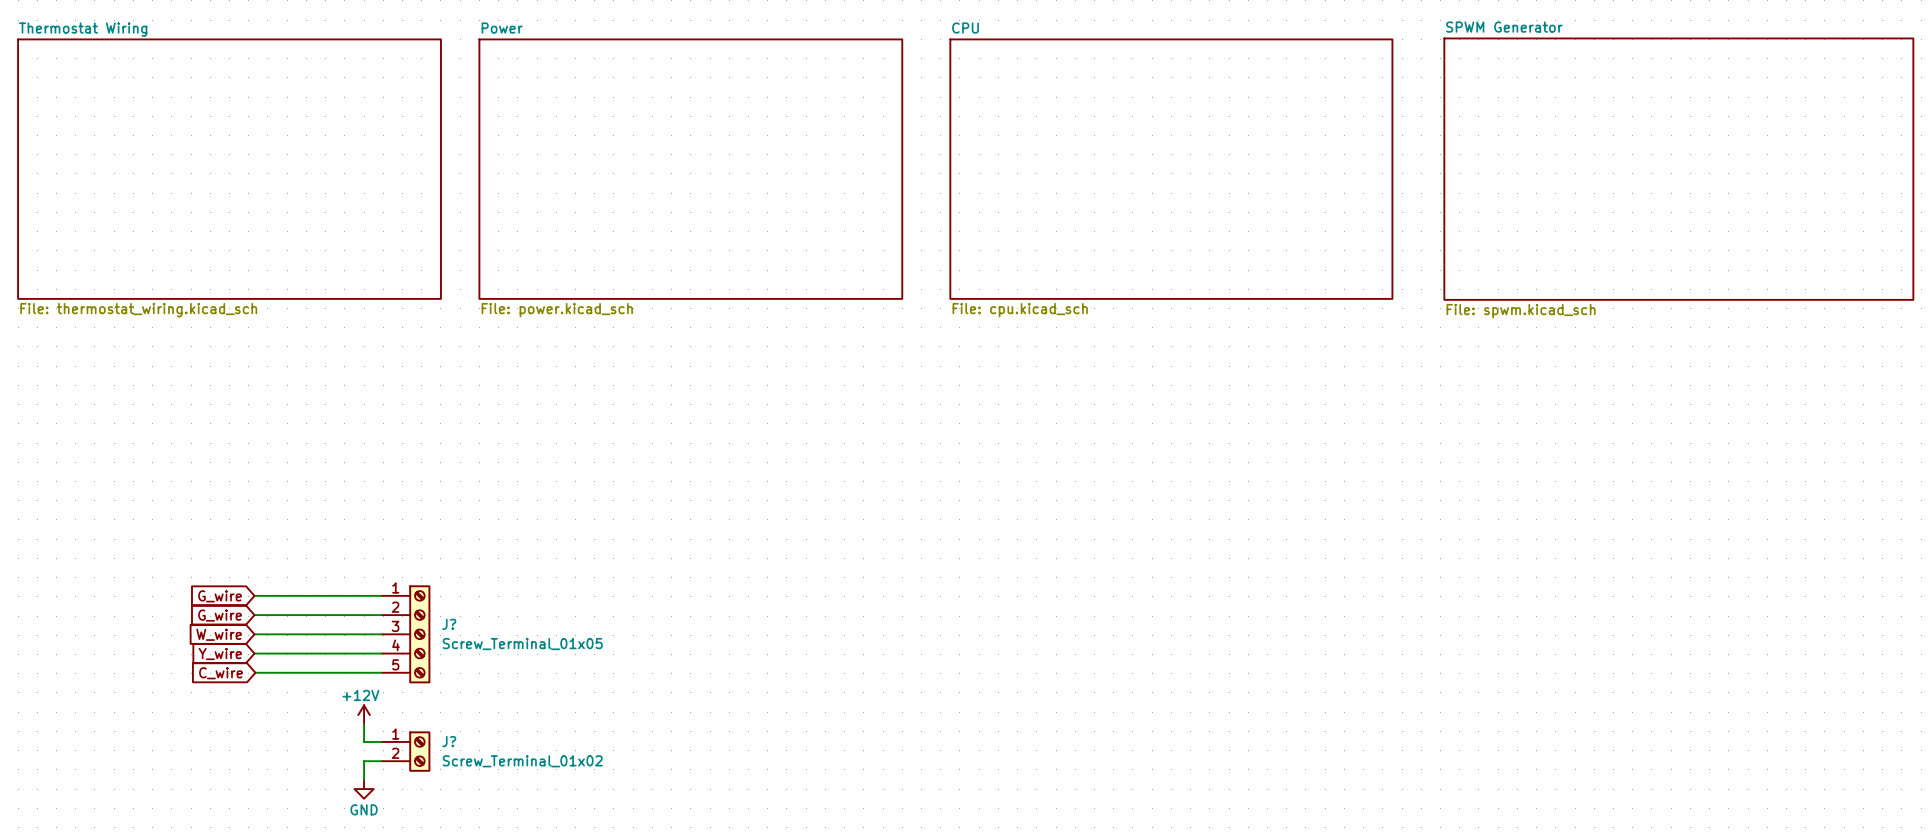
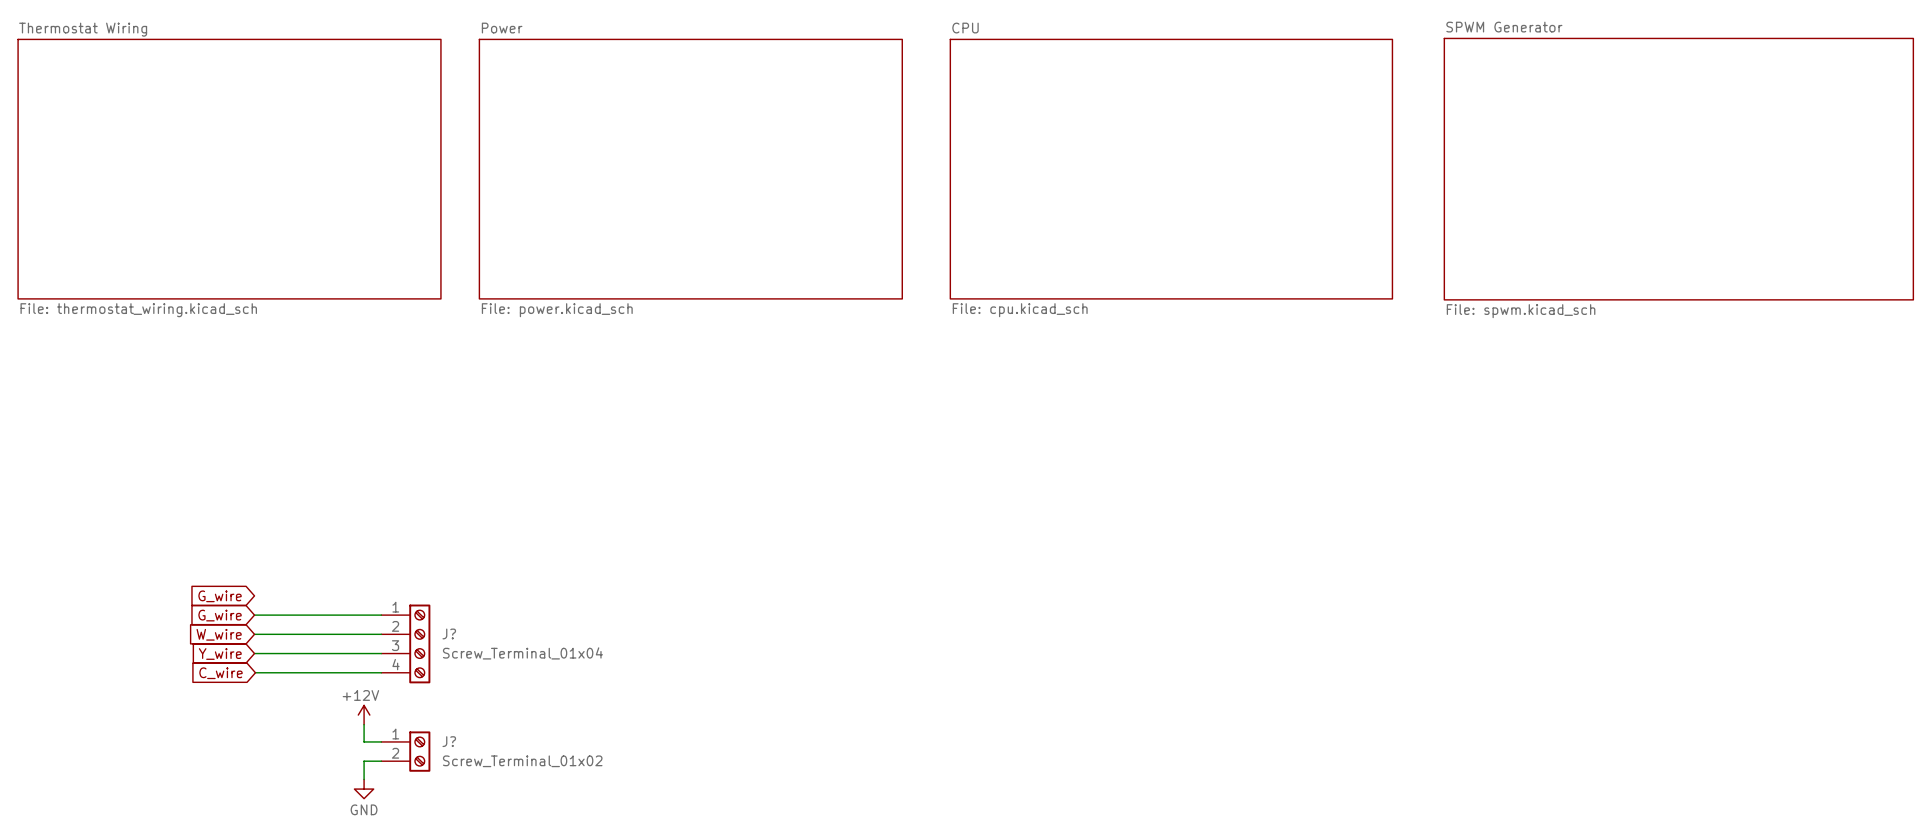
wire: (255, 595) (381, 595) -> none
J?: Screw_Terminal_01x05 (405, 634) -> none
J?: none -> Screw_Terminal_01x04 (405, 643)

